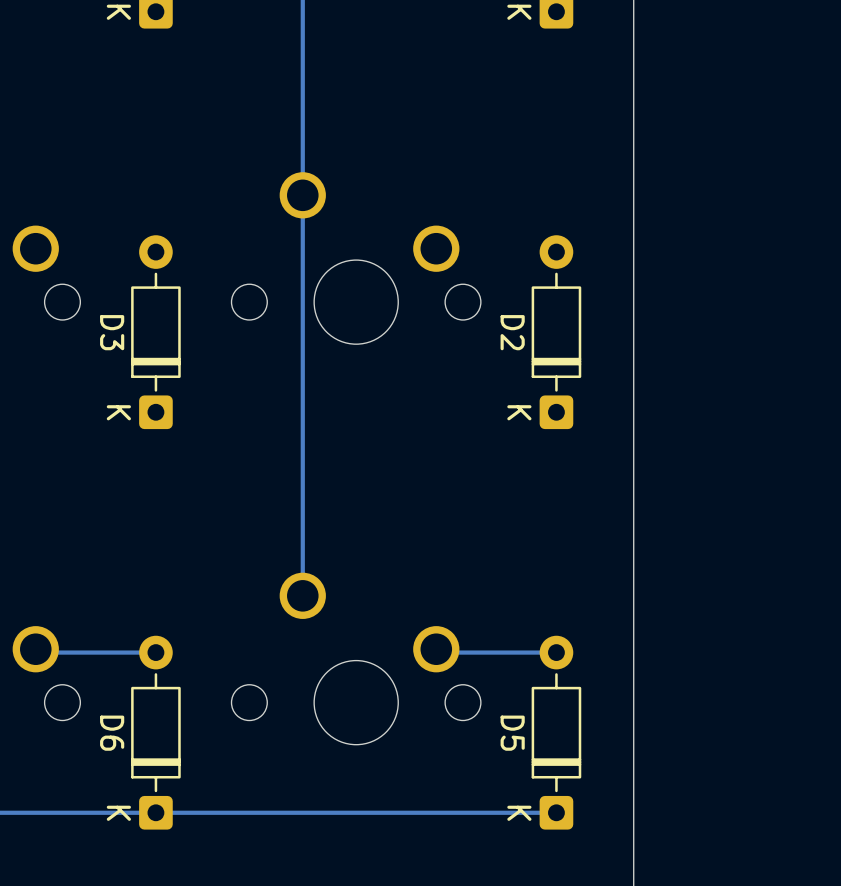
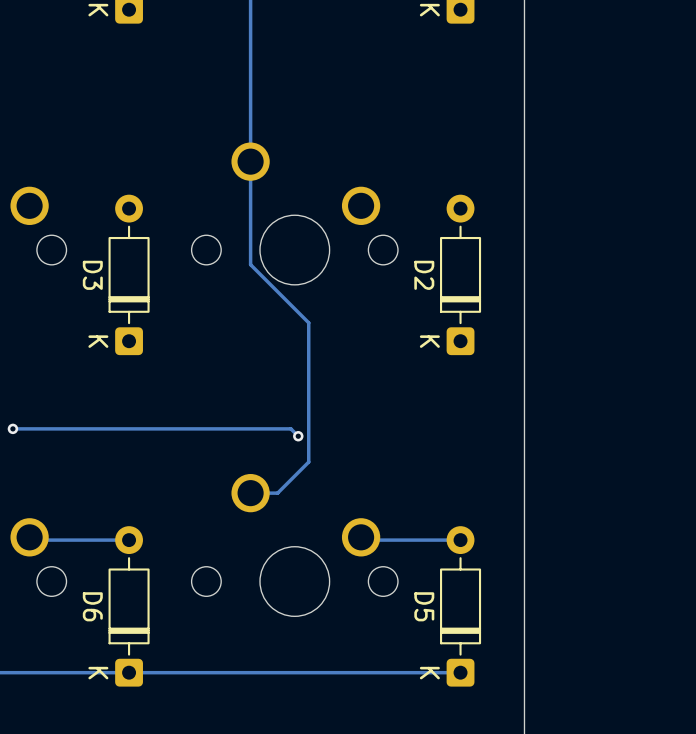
track: (302, 319) (302, 595) -> (250, 264) (308, 322) (308, 462) (277, 493) (250, 493)
track: none -> (12, 428) (290, 428) (298, 436)
via: none -> (12, 428)
via: none -> (298, 436)

